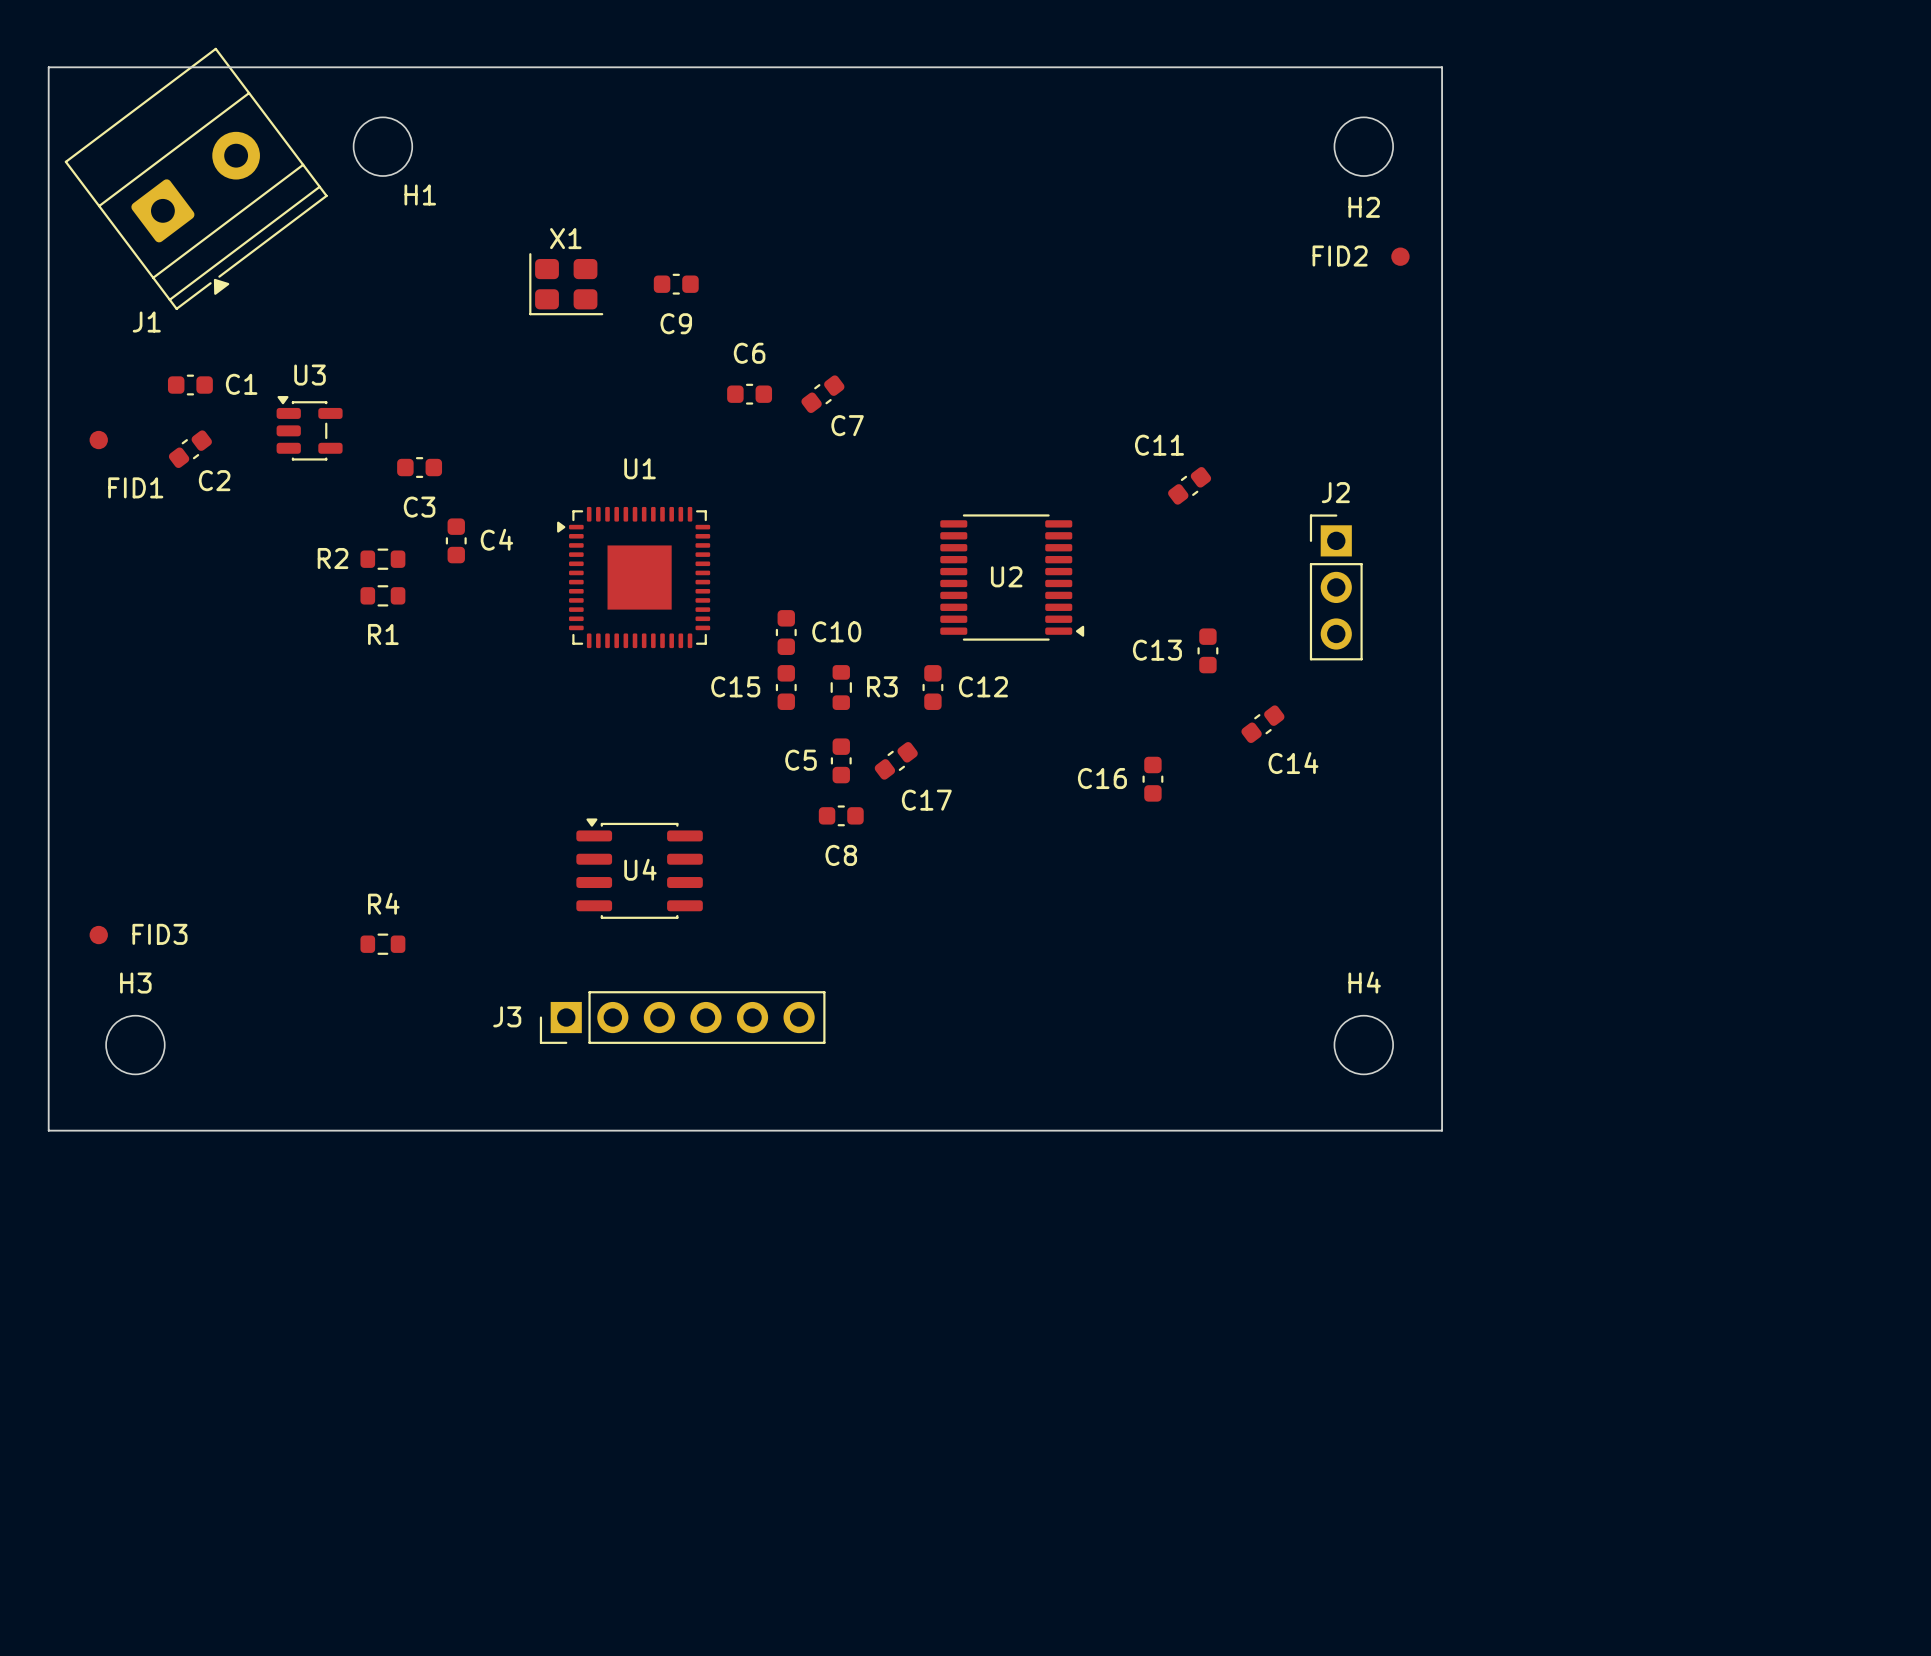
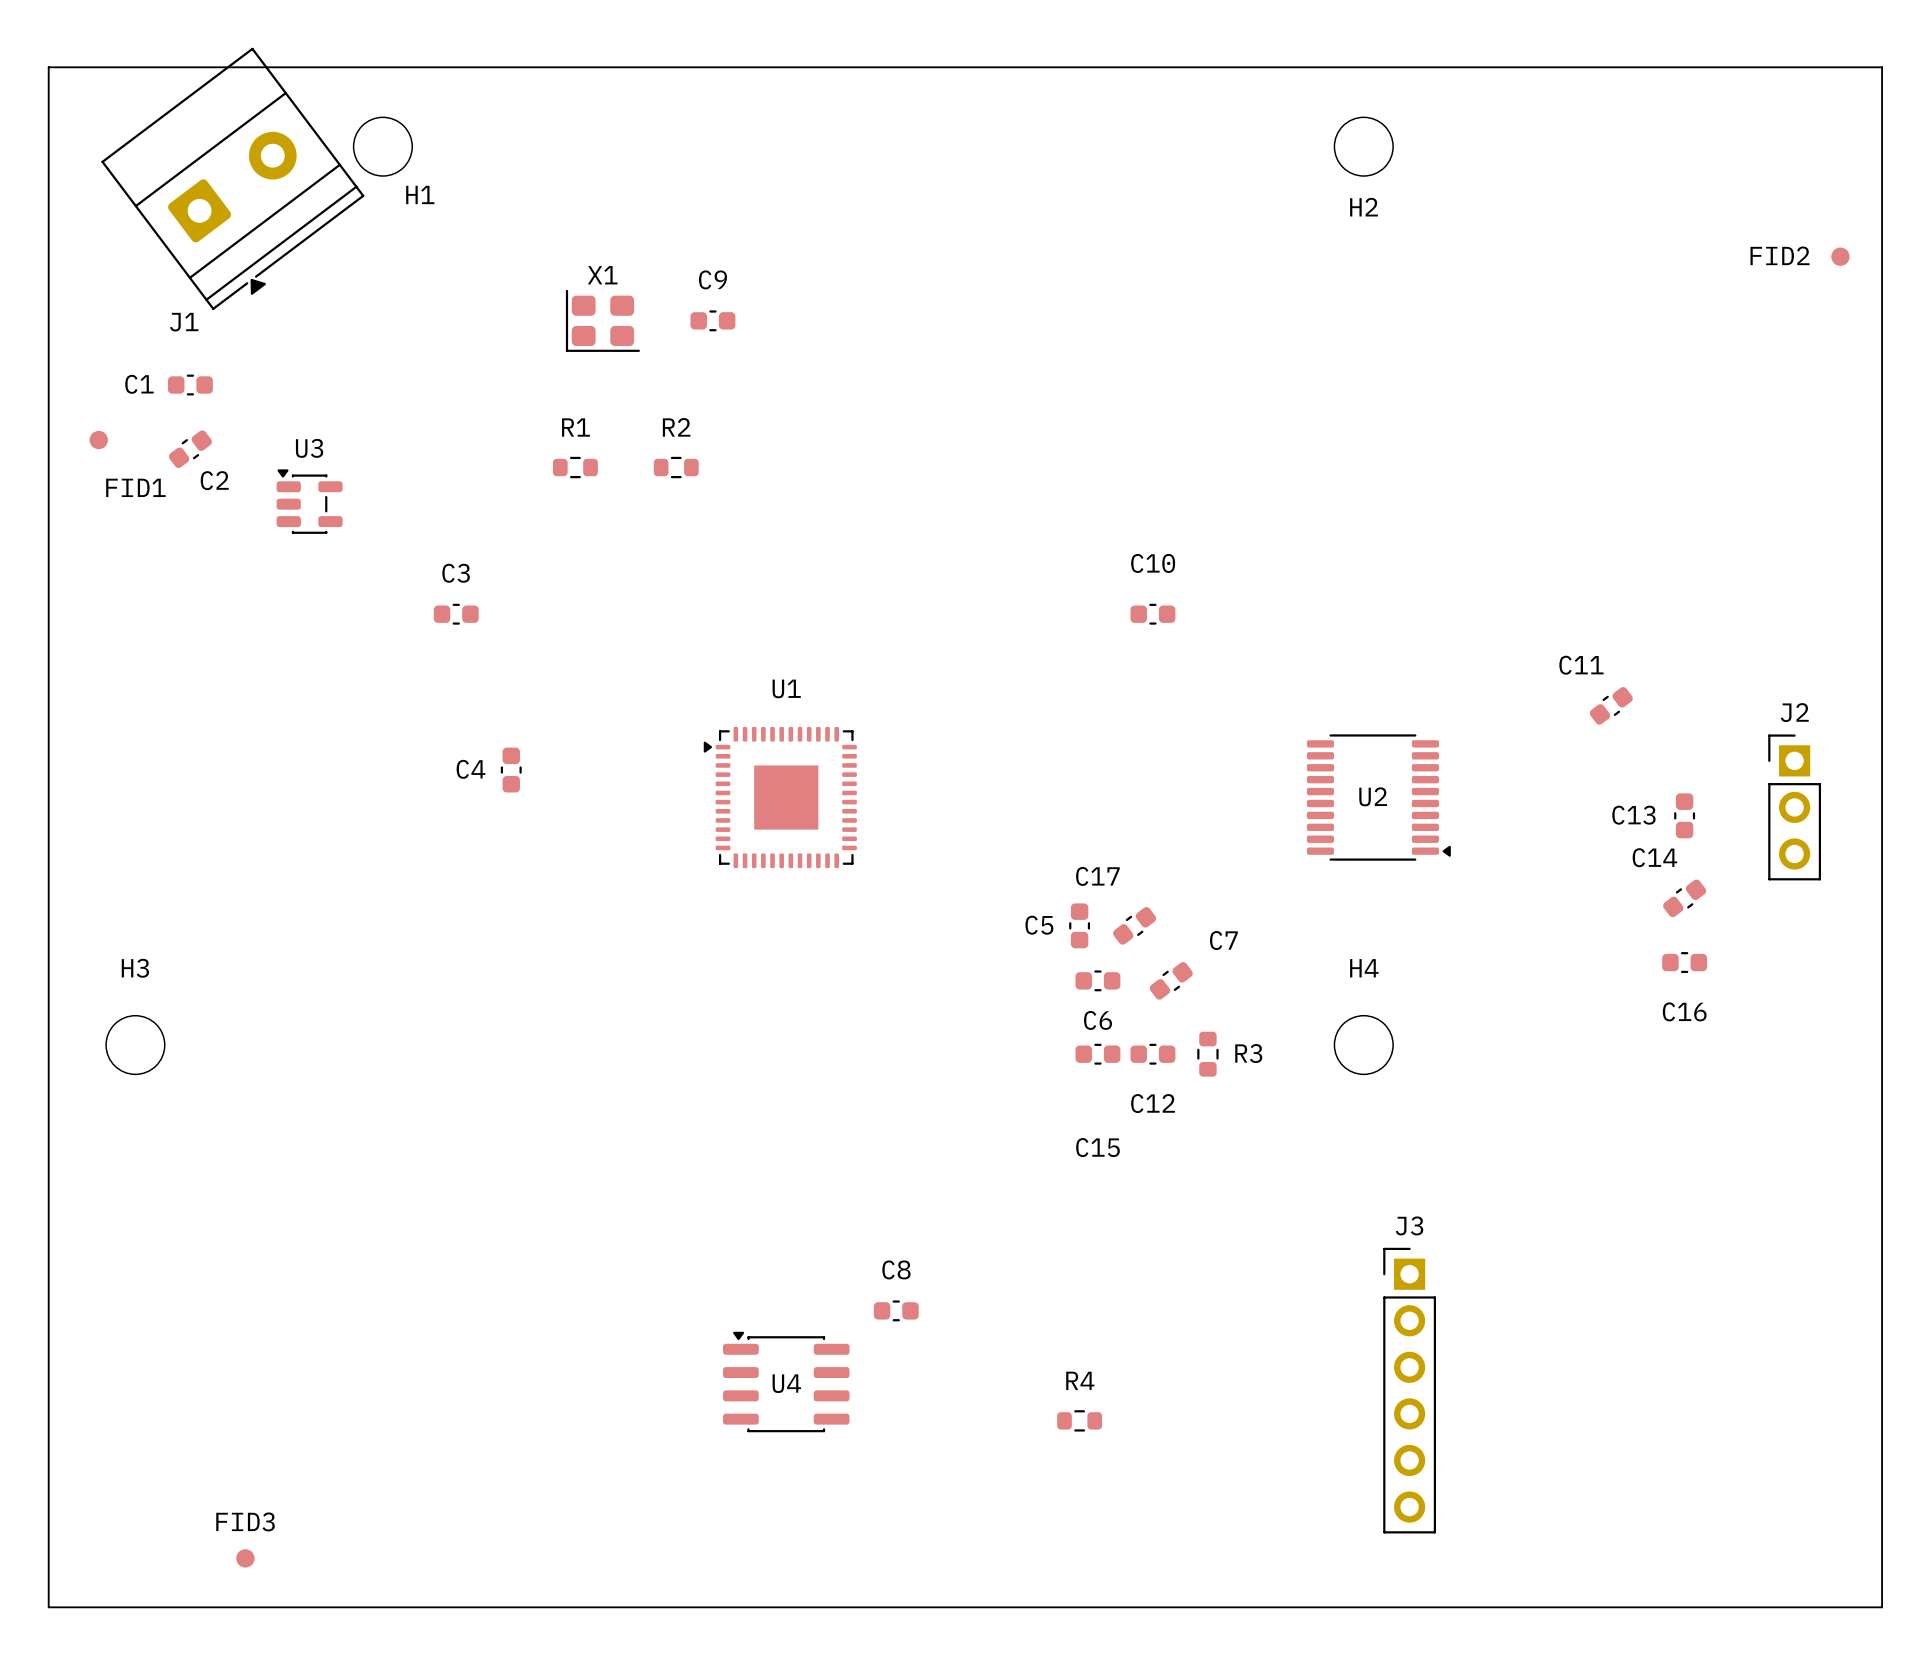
board edge: (1442, 67) (1442, 1130) (48, 1130) -> (1442, 67) (1882, 67) (1882, 1607) (48, 1607) (48, 1130)
J1 position: (196, 178) -> (232, 178)
FID2 position: (1400, 256) -> (1840, 256)
X1 position: (566, 284) -> (602, 320)
C9 position: (676, 284) -> (712, 320)
C9 name position: C9 (676, 323) -> C9 (713, 279)
C6 name position: C6 (749, 353) -> C6 (1098, 1020)
C1 name position: C1 (241, 384) -> C1 (139, 384)
C6 position: (749, 394) -> (1097, 980)
C7 position: (822, 394) -> (1171, 980)
C7 name position: C7 (847, 425) -> C7 (1223, 940)
U3 position: (309, 428) -> (309, 501)
C3 position: (419, 467) -> (456, 614)
C11 position: (1189, 485) -> (1611, 705)
C3 name position: C3 (419, 507) -> C3 (456, 573)
C4 name position: C4 (496, 539) -> C4 (470, 769)
C4 position: (456, 540) -> (511, 770)
R2 name position: R2 (333, 558) -> R2 (676, 427)
R2 position: (382, 559) -> (676, 467)
U1 position: (633, 577) -> (780, 797)
U2 position: (1012, 577) -> (1378, 797)
J2 position: (1336, 587) -> (1794, 807)
R1 position: (382, 595) -> (575, 467)
C10 name position: C10 (836, 631) -> C10 (1153, 563)
C10 rotation: 0° (786, 632) -> 90° clockwise (1152, 614)
C10 position: (786, 632) -> (1152, 614)
R1 name position: R1 (383, 634) -> R1 (575, 427)
C13 position: (1207, 650) -> (1684, 815)
C15 name position: C15 (735, 686) -> C15 (1097, 1147)
C15 rotation: 0° (786, 687) -> 90° clockwise (1097, 1054)
C15 position: (786, 687) -> (1097, 1054)
R3 position: (841, 687) -> (1207, 1054)
C12 rotation: 0° (932, 687) -> 90° clockwise (1152, 1054)
C12 position: (932, 687) -> (1152, 1054)
C14 position: (1262, 724) -> (1684, 898)
C5 position: (841, 760) -> (1079, 925)
C17 position: (896, 760) -> (1134, 925)
C14 name position: C14 (1293, 763) -> C14 (1654, 857)
C16 name position: C16 (1102, 778) -> C16 (1684, 1011)
C16 rotation: 0° (1152, 779) -> 90° clockwise (1684, 962)
C16 position: (1152, 779) -> (1684, 962)
C17 name position: C17 (926, 800) -> C17 (1097, 876)
C8 position: (841, 815) -> (896, 1310)
C8 name position: C8 (841, 855) -> C8 (896, 1269)
U4 position: (639, 868) -> (786, 1382)
FID3 name position: FID3 (159, 934) -> FID3 (245, 1521)
FID3 position: (98, 935) -> (245, 1558)
R4 position: (382, 944) -> (1079, 1420)
H4 name position: H4 (1364, 982) -> H4 (1364, 968)
H3 name position: H3 (135, 983) -> H3 (135, 968)
J3 rotation: 0° (682, 1017) -> 90° clockwise (1409, 1390)
J3 position: (682, 1017) -> (1409, 1390)

